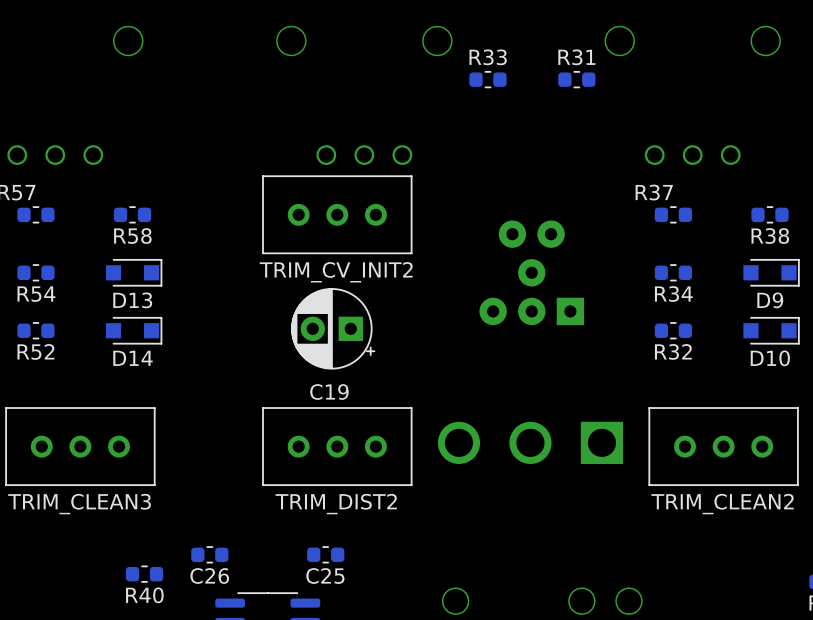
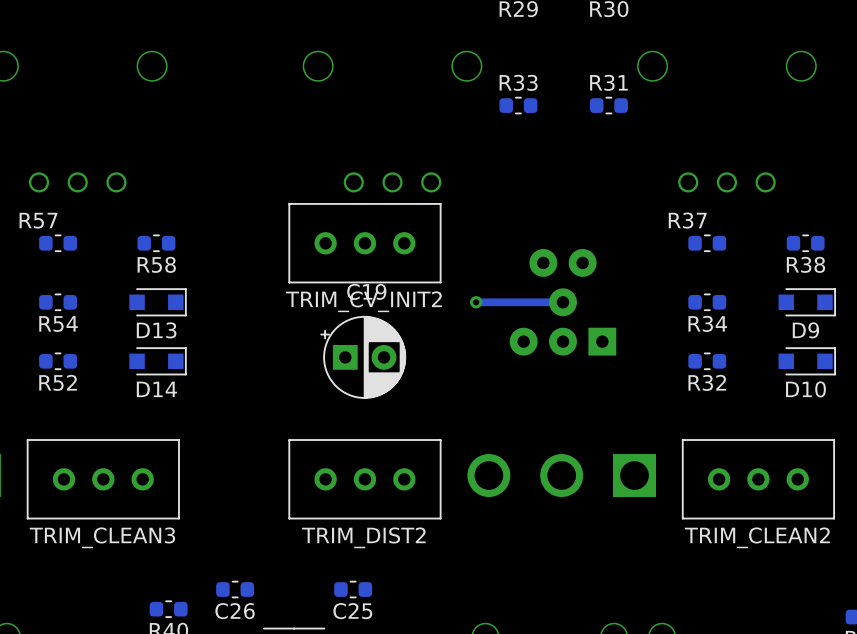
via: none -> (476, 302)
track: none -> (563, 302) (476, 302)
C19 rotation: 0° (333, 328) -> 180° (363, 357)

